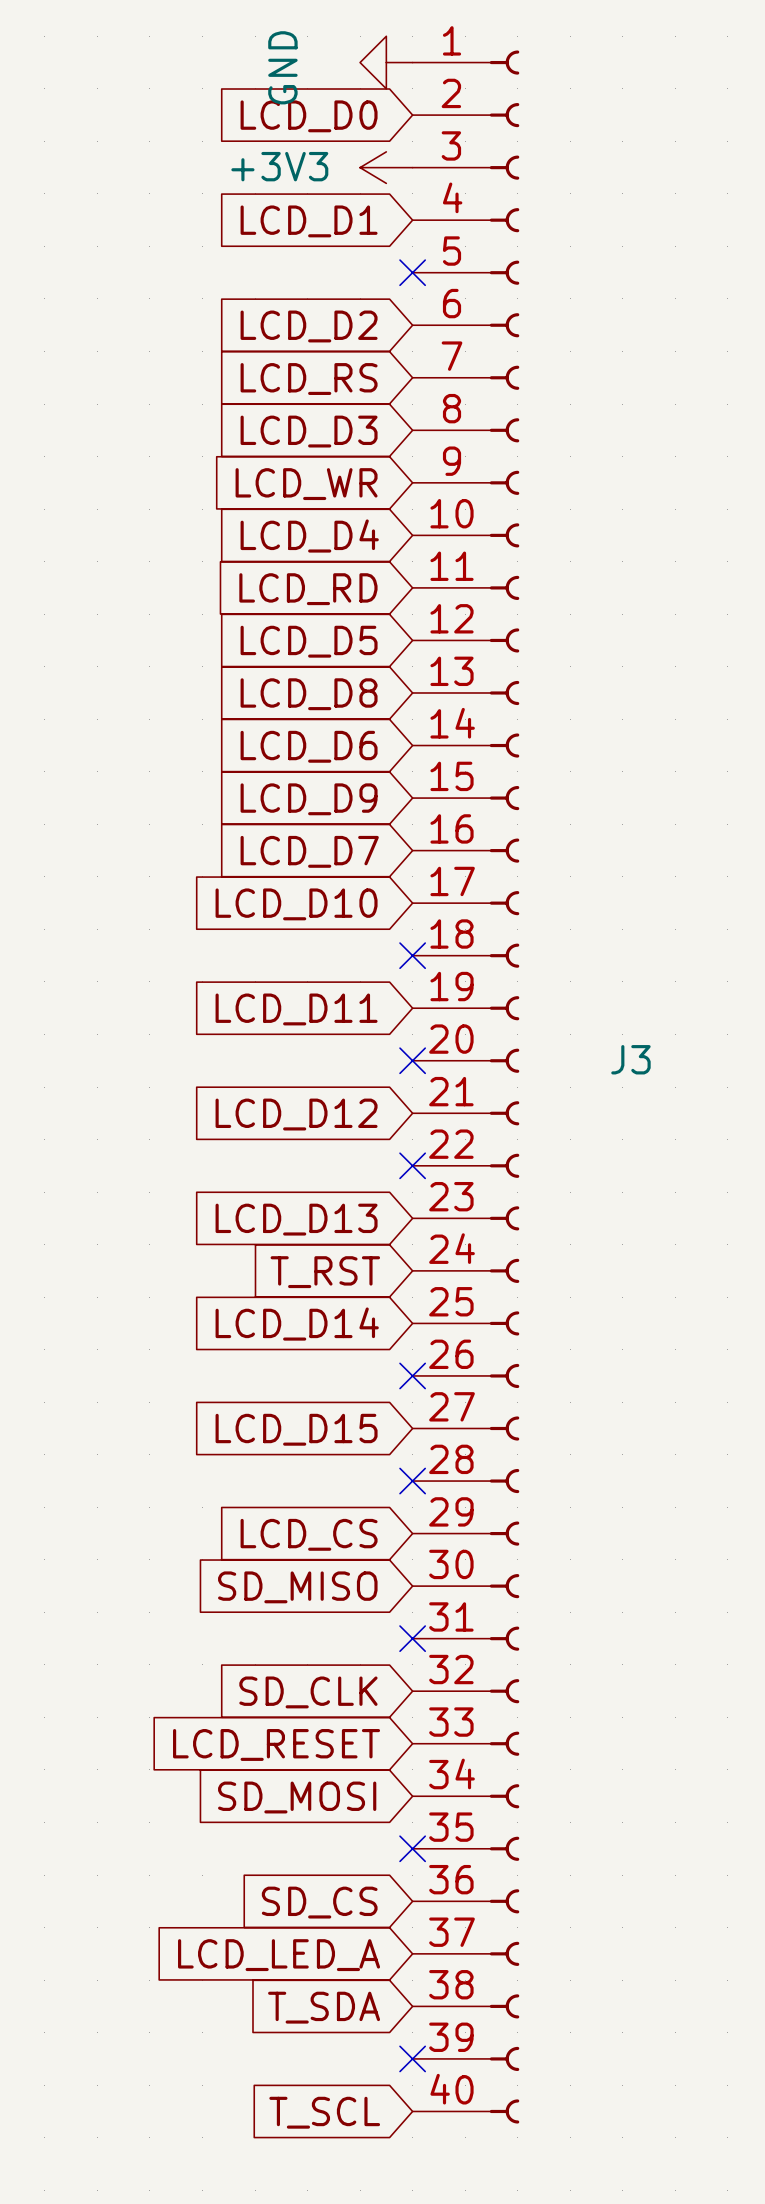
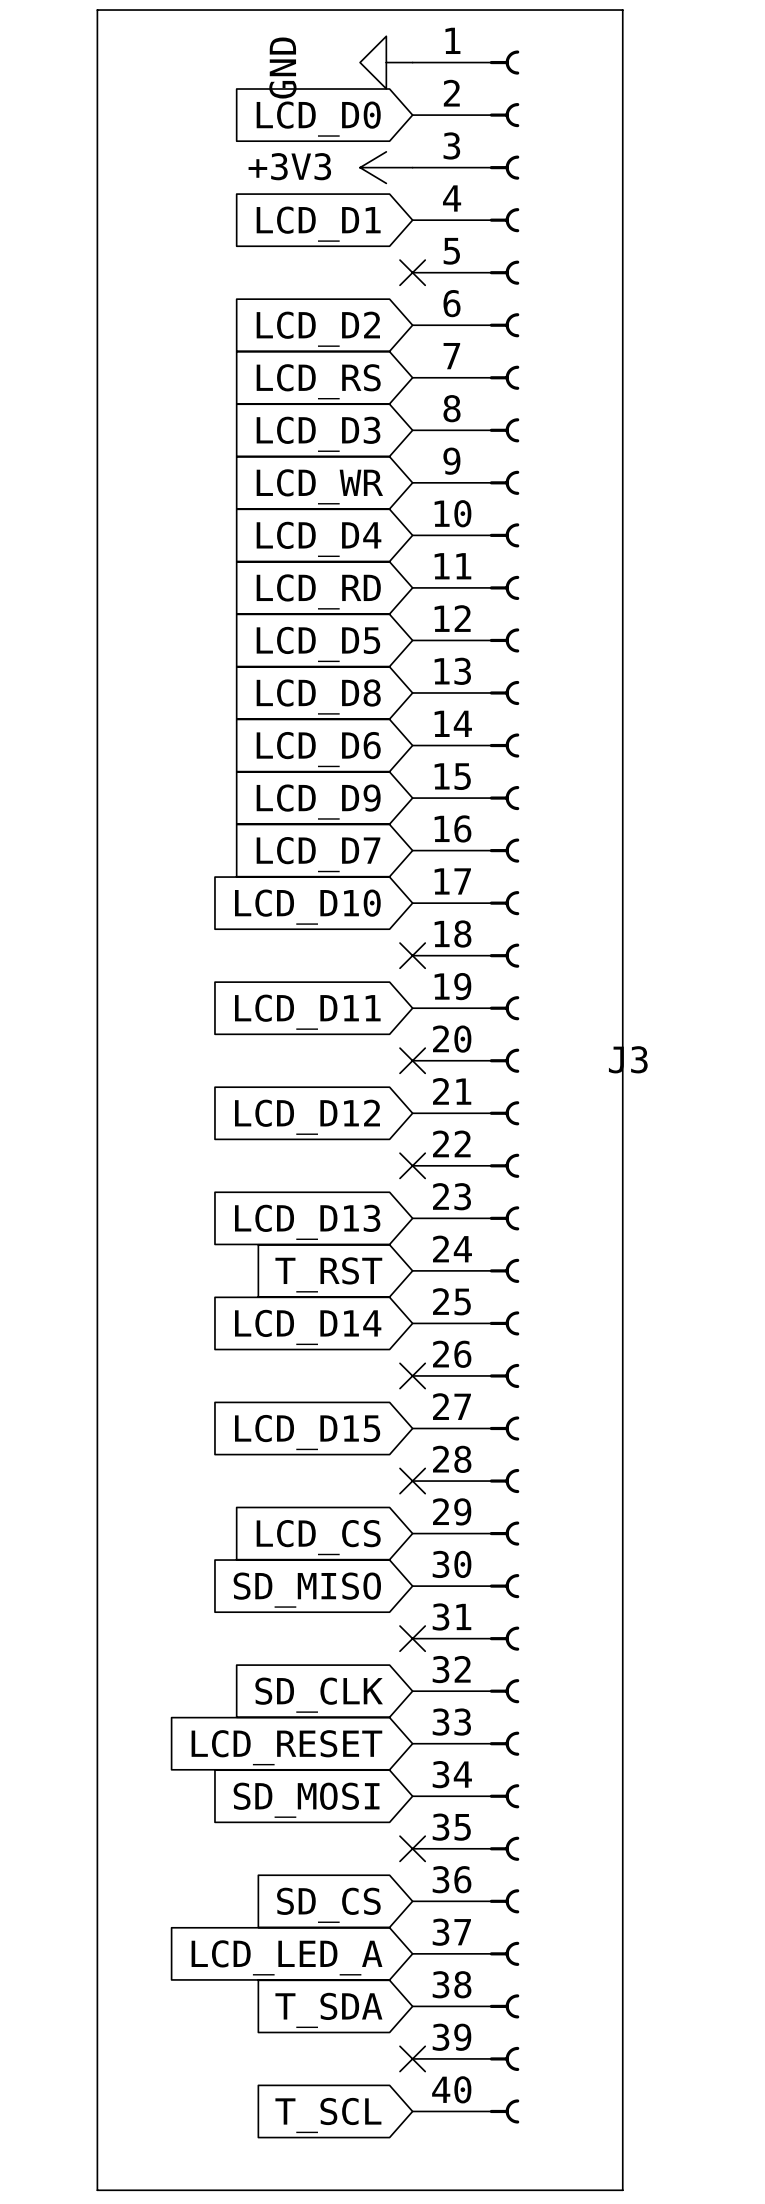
line: none -> (97, 10) (622, 10) (622, 2190) (97, 2190) (97, 10)

